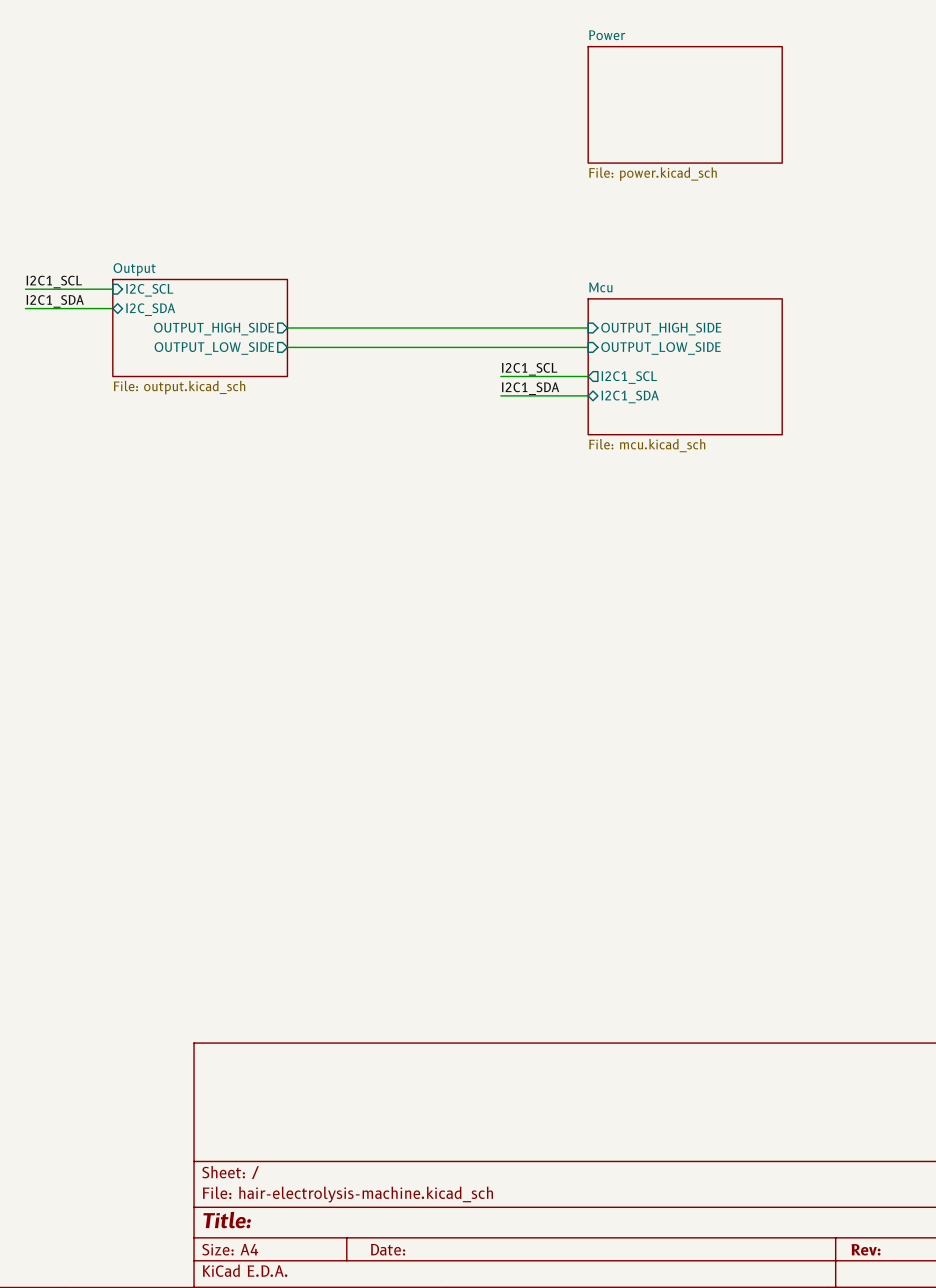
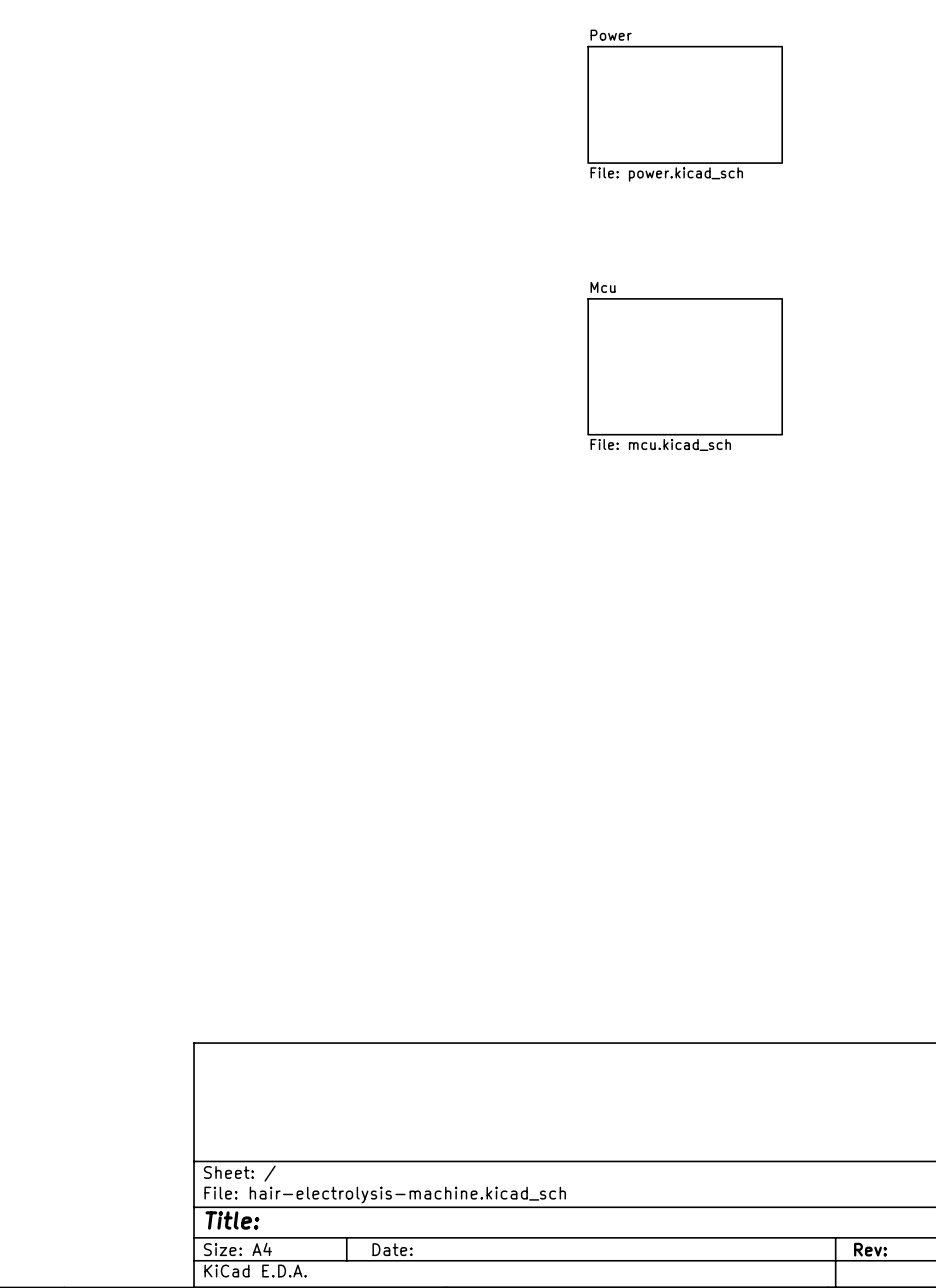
label: I2C1_SCL (54, 281) -> none
wire: (25, 289) (112, 289) -> none
sheet pin: I2C_SCL (149, 290) -> none
label: I2C1_SDA (55, 301) -> none
wire: (25, 308) (112, 308) -> none
sheet pin: I2C_SDA (150, 309) -> none
sheet Output: File: output.kicad_sch (200, 327) -> none
wire: (287, 327) (588, 327) -> none
sheet pin: OUTPUT_HIGH_SIDE (214, 329) -> none
sheet pin: OUTPUT_HIGH_SIDE (661, 329) -> none
wire: (287, 347) (588, 347) -> none
sheet pin: OUTPUT_LOW_SIDE (214, 348) -> none
sheet pin: OUTPUT_LOW_SIDE (661, 348) -> none
label: I2C1_SCL (529, 369) -> none
wire: (500, 376) (588, 376) -> none
sheet pin: I2C1_SCL (629, 377) -> none
label: I2C1_SDA (530, 388) -> none
wire: (500, 395) (588, 395) -> none
sheet pin: I2C1_SDA (630, 396) -> none

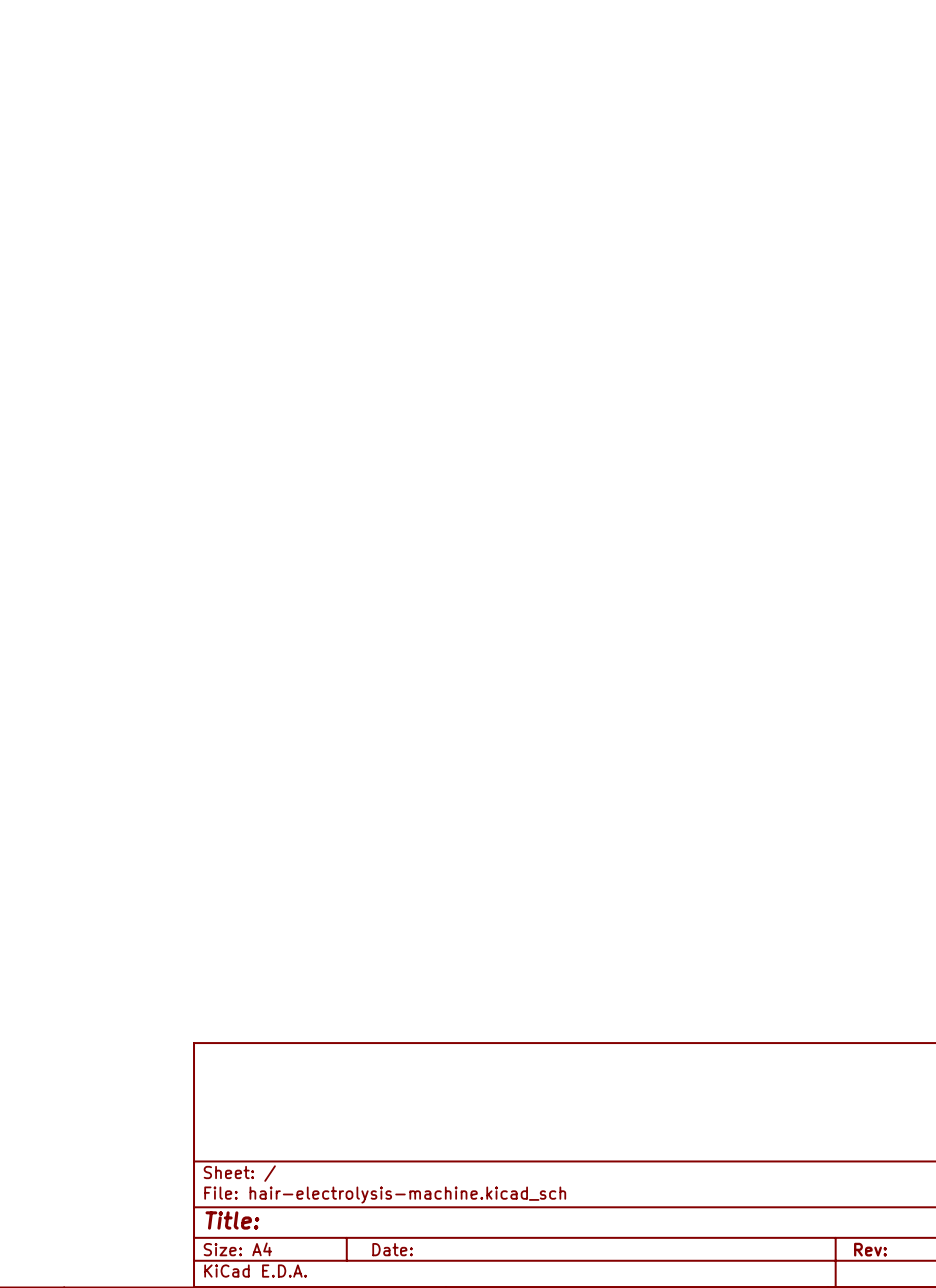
sheet Power: File: power.kicad_sch (685, 104) -> none
sheet Mcu: File: mcu.kicad_sch (685, 366) -> none

